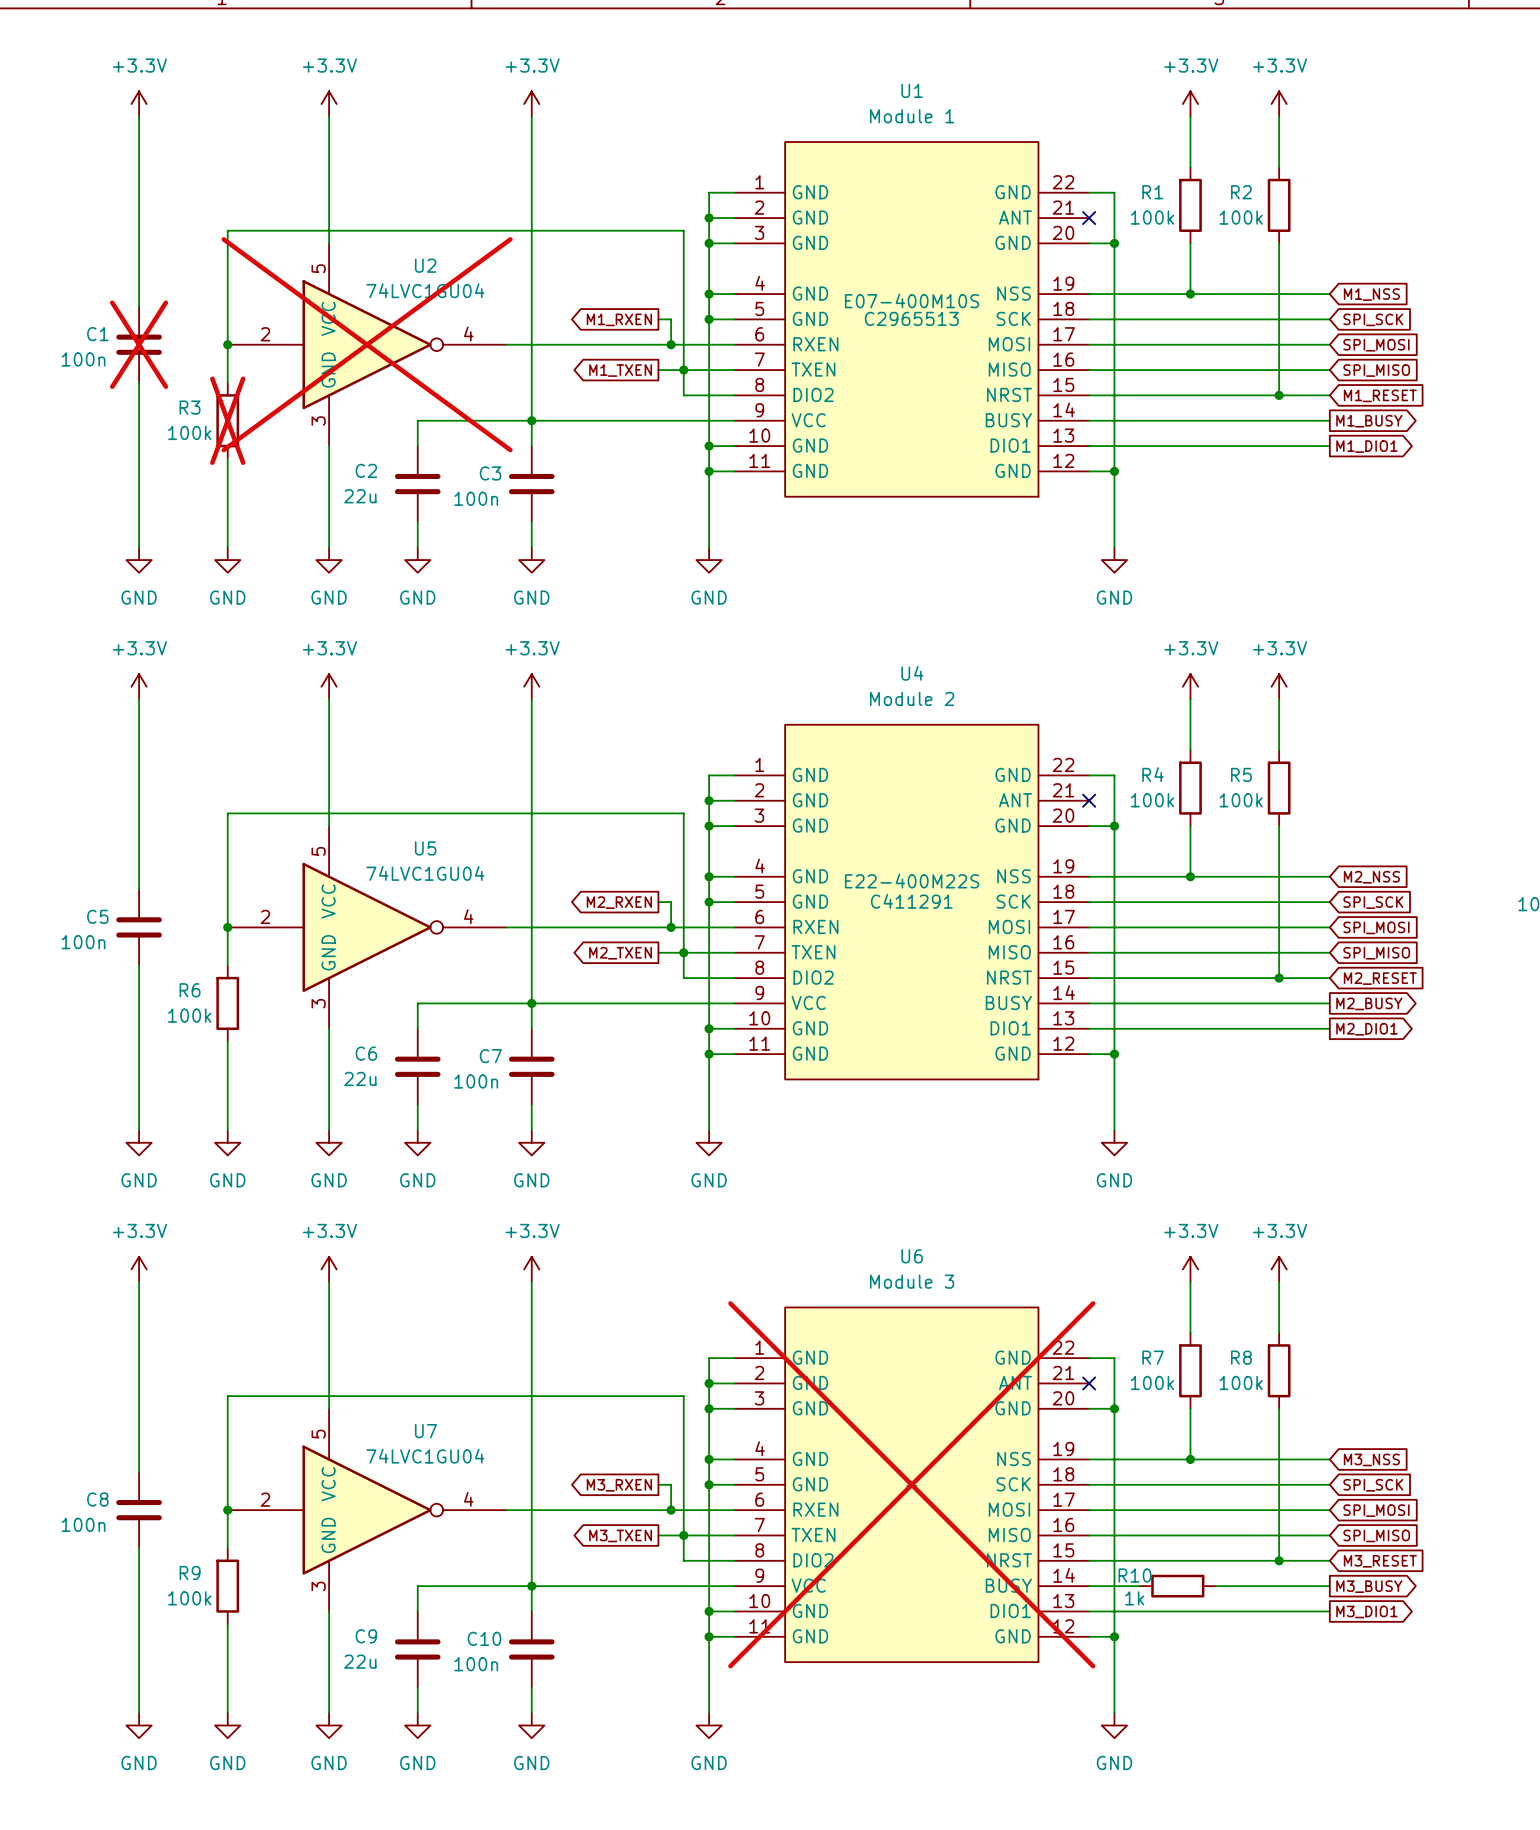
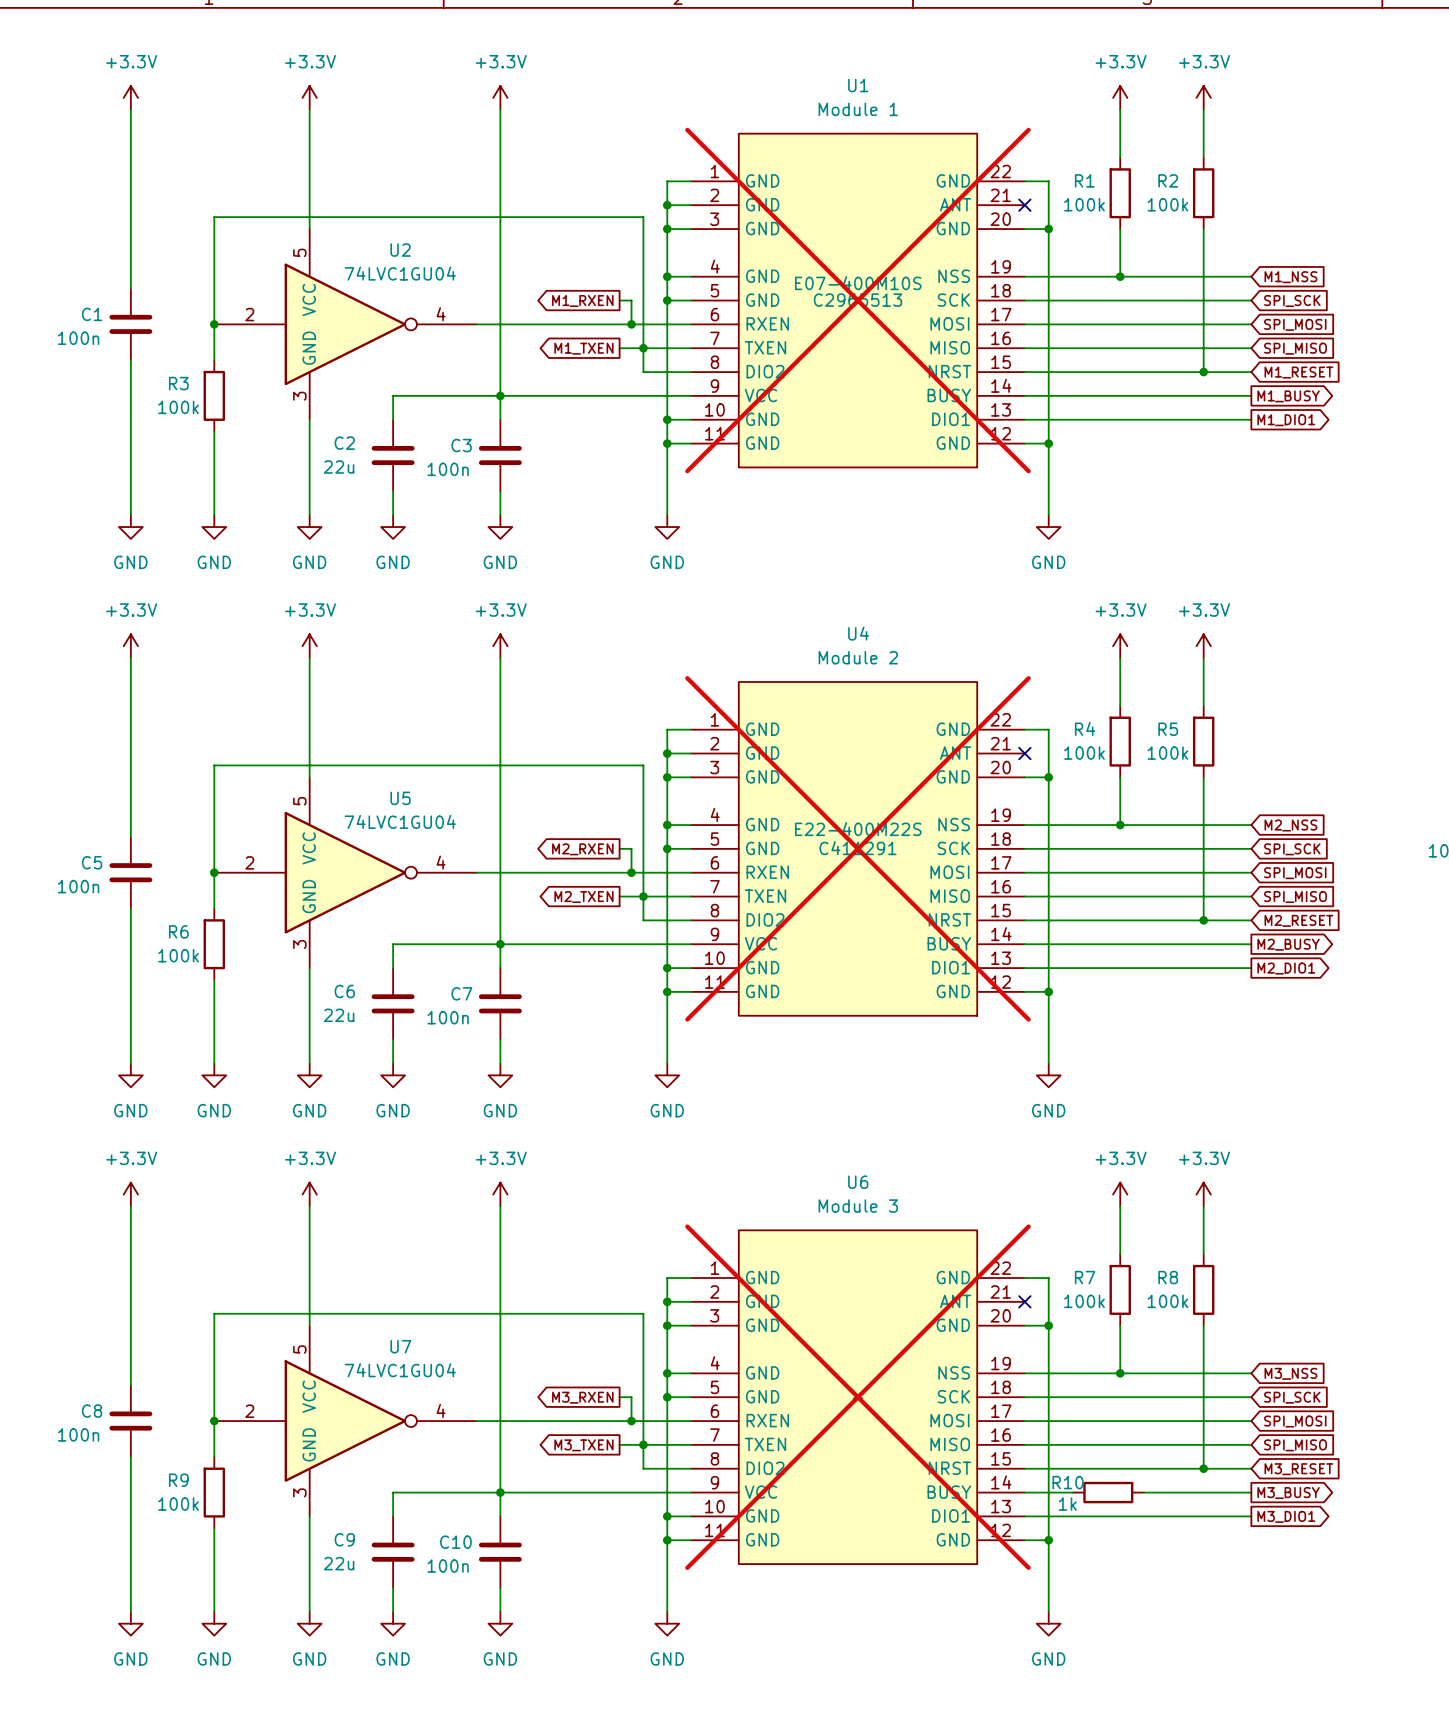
U1 do-not-place cross: none -> (857, 300)
C1 do-not-place cross: (139, 344) -> none
U2 do-not-place cross: (367, 344) -> none
R3 do-not-place cross: (227, 420) -> none
U4 do-not-place cross: none -> (857, 848)

